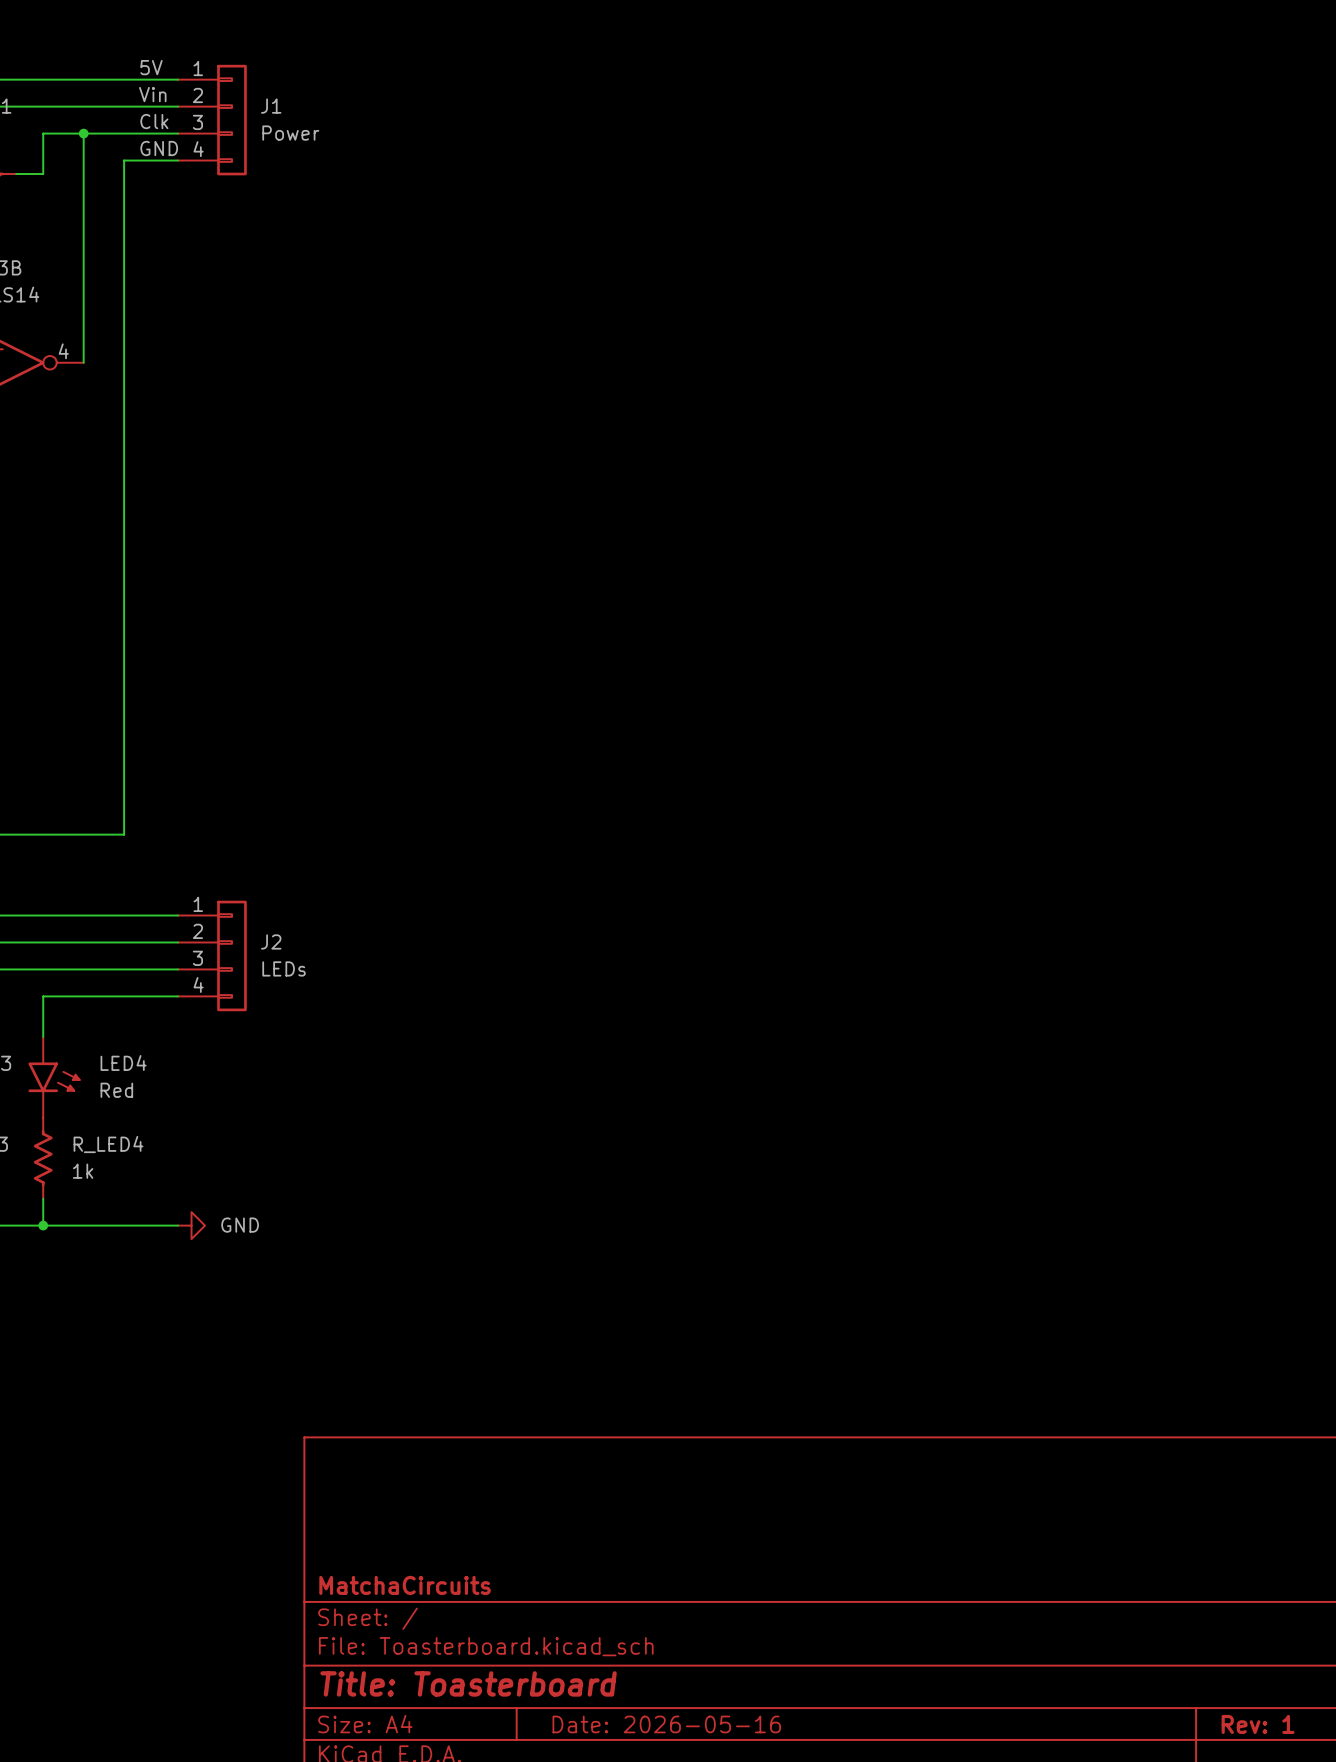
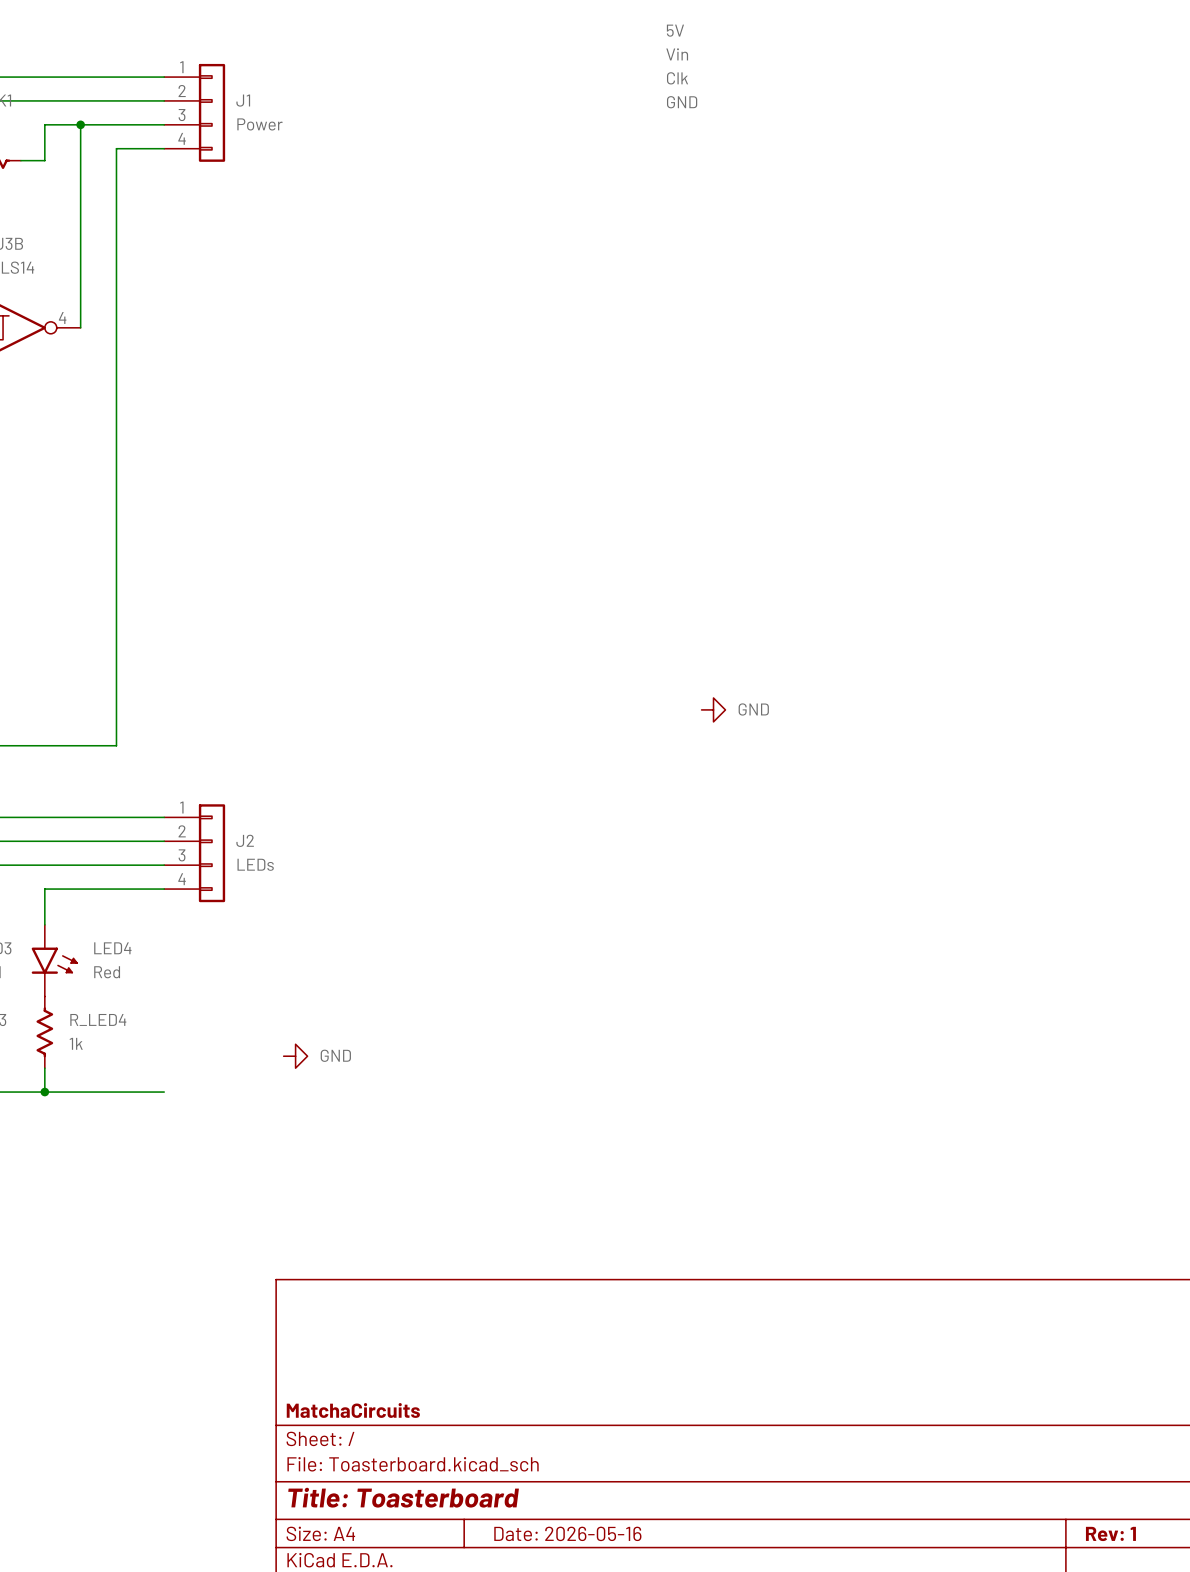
label: none -> 5V (675, 30)
label: none -> Vin (677, 54)
label: 5V (151, 67) -> none
label: none -> Clk (677, 78)
label: Vin (152, 94) -> none
label: none -> GND (682, 102)
label: Clk (154, 121) -> none
label: GND (159, 148) -> none
power symbol: none -> GND (713, 709)
power symbol position: GND (191, 1225) -> GND (295, 1056)

